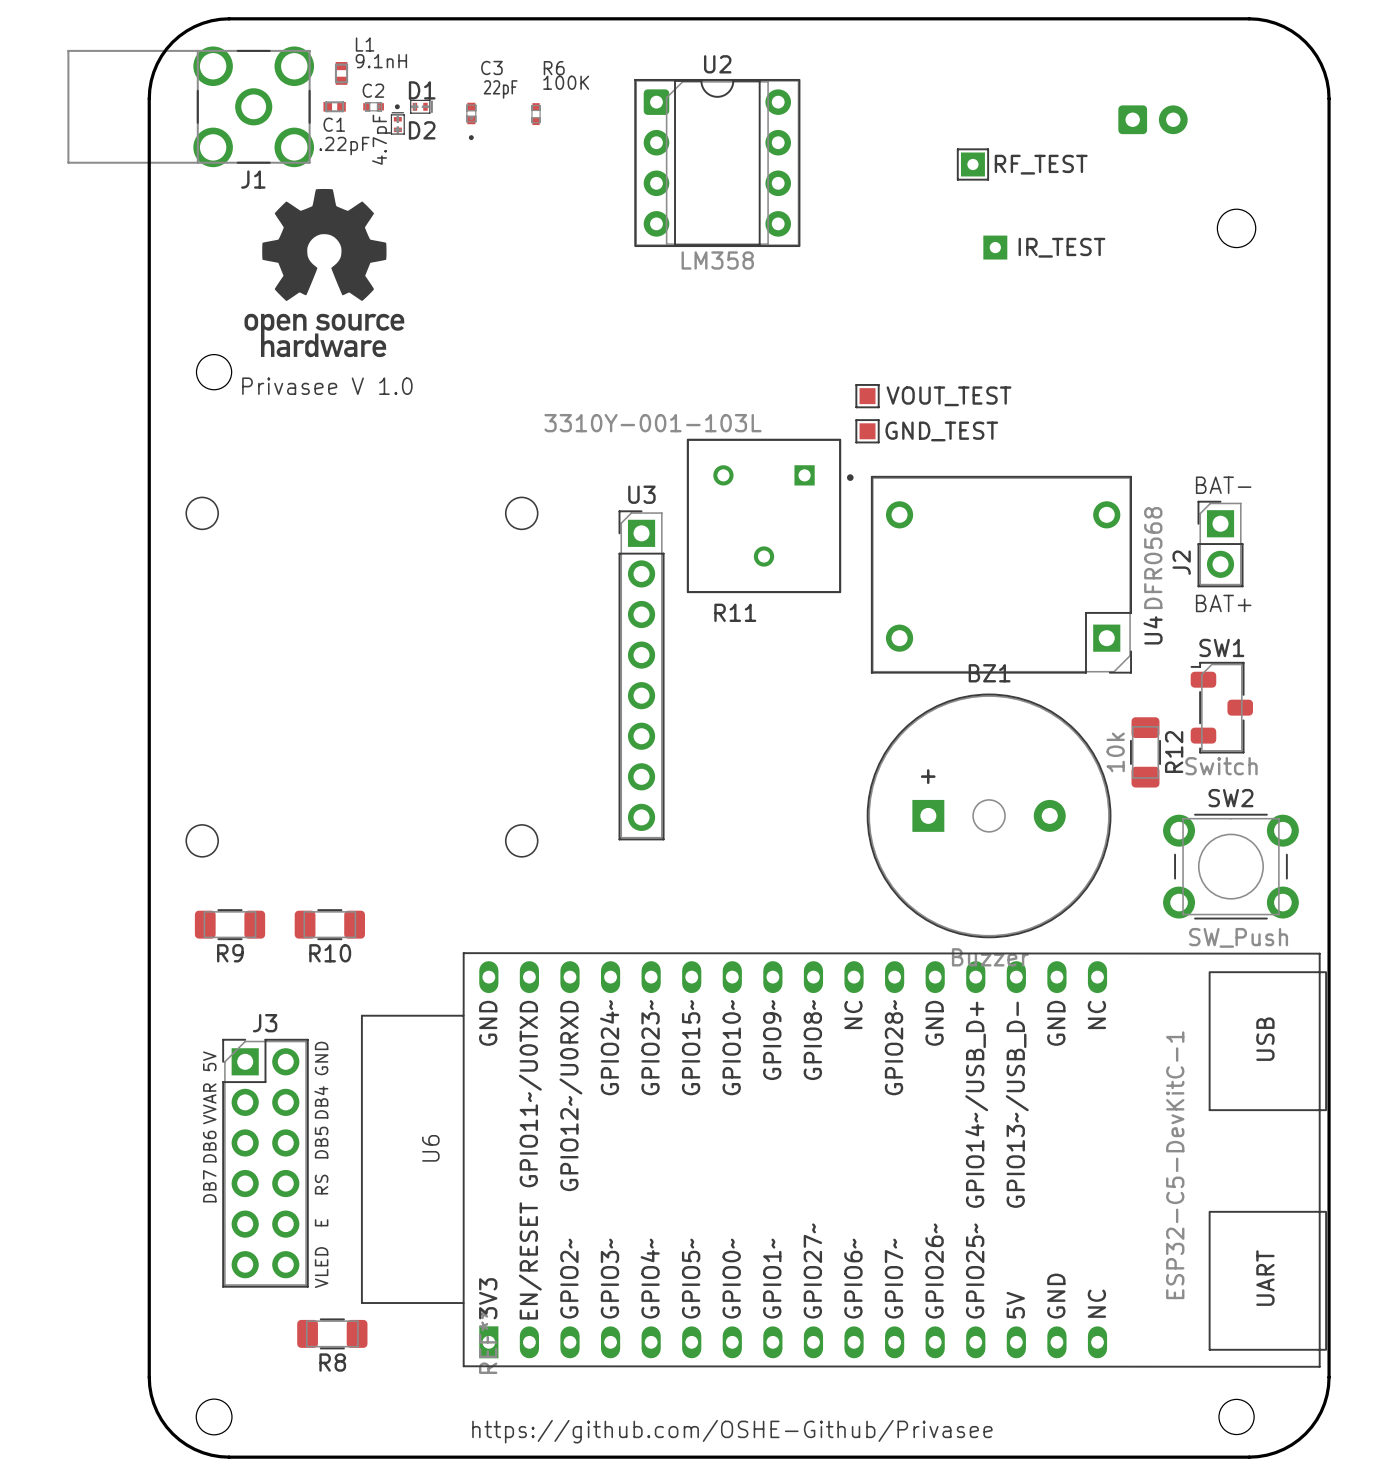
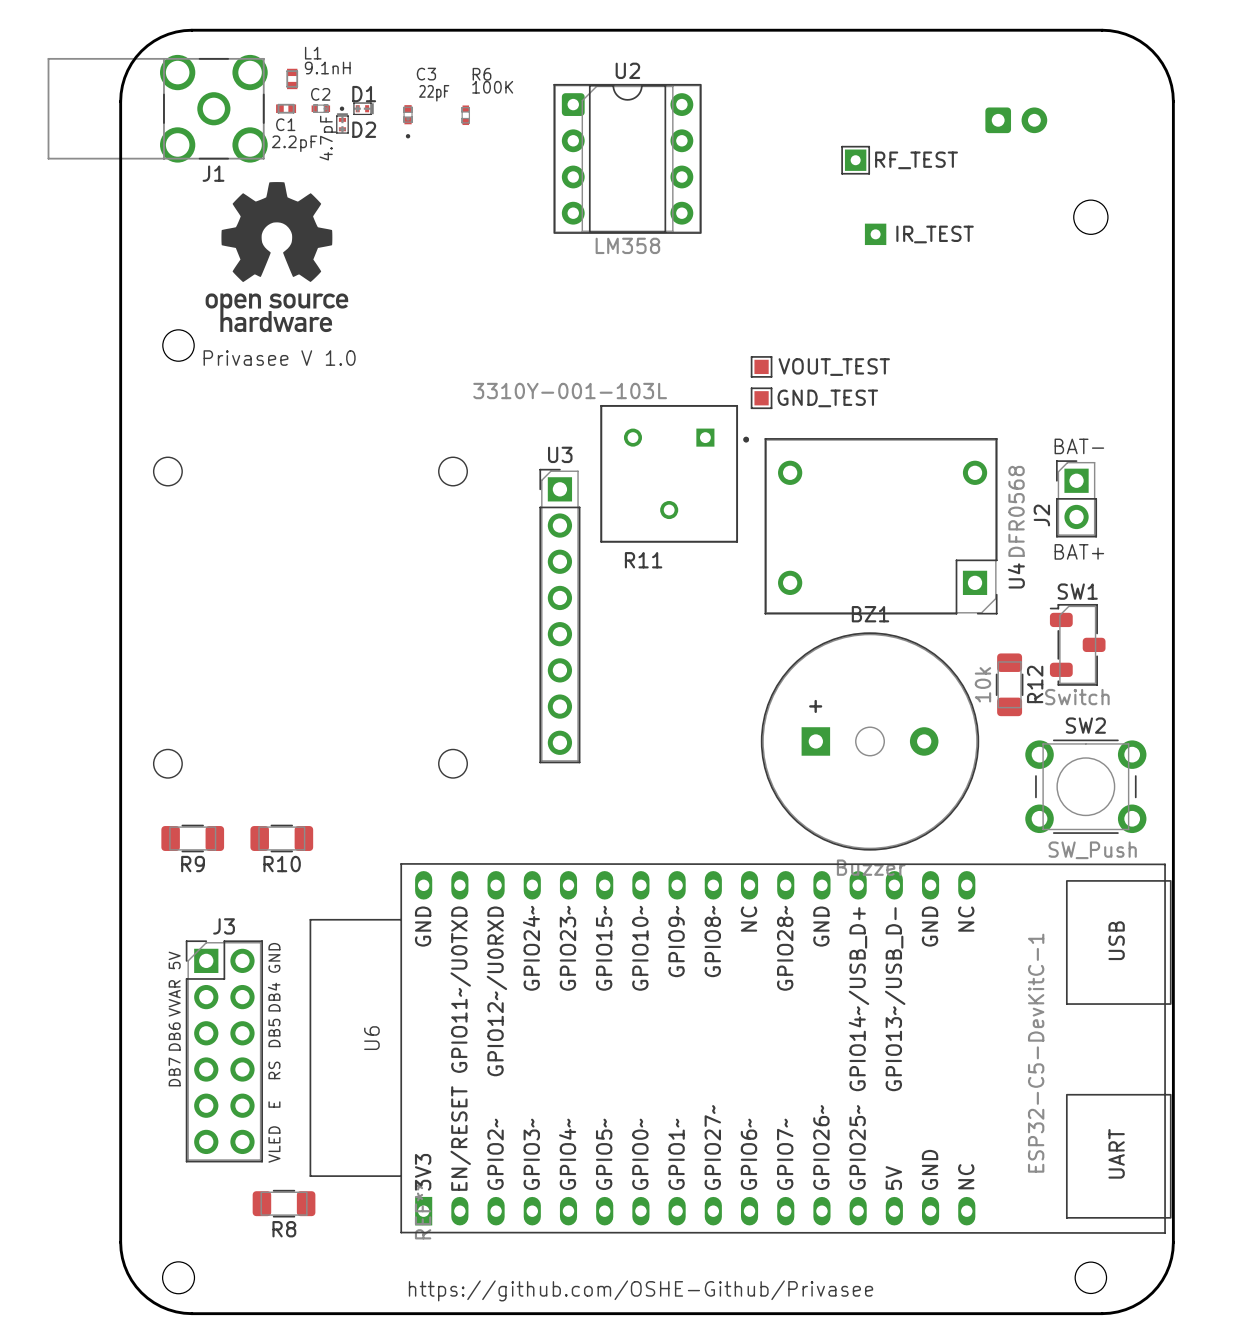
text: .22pF (344, 146) -> 2.2pF (294, 143)

